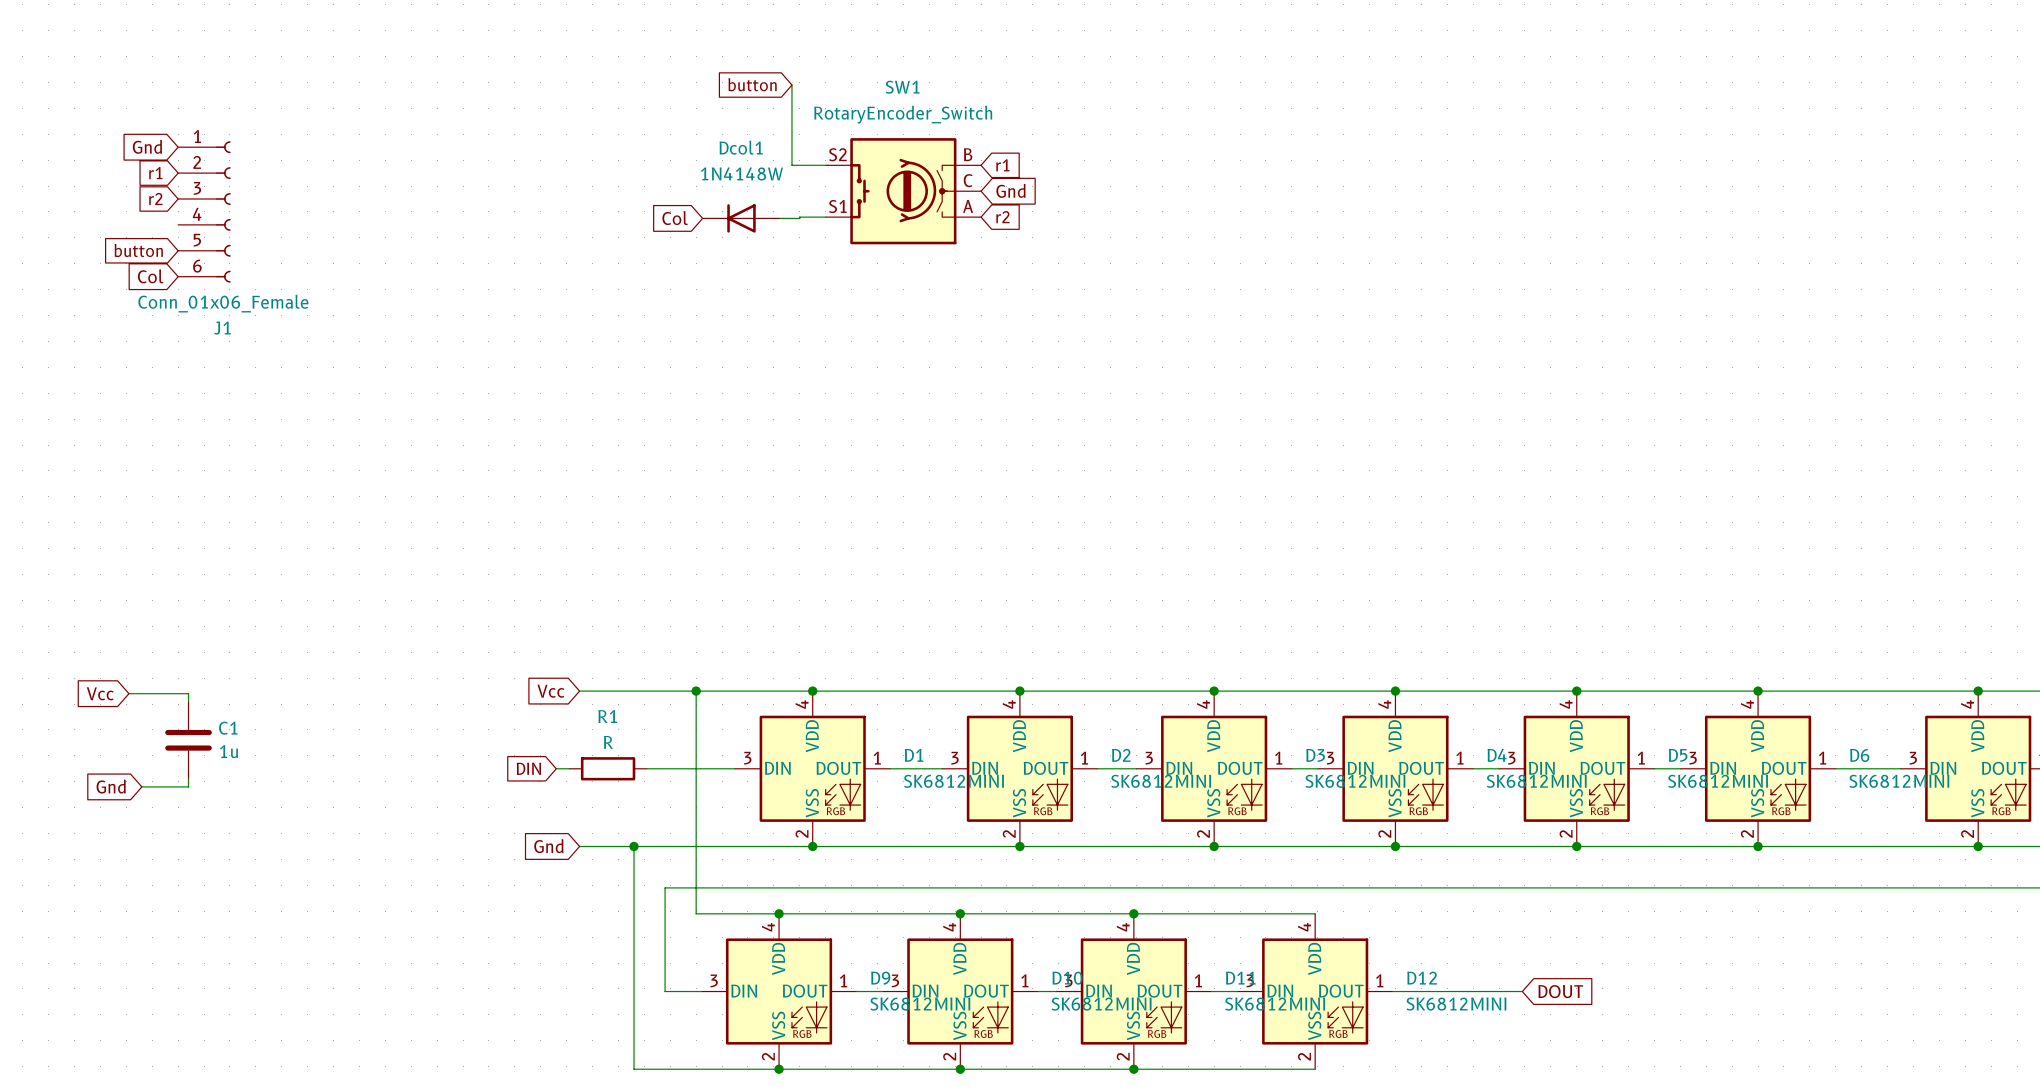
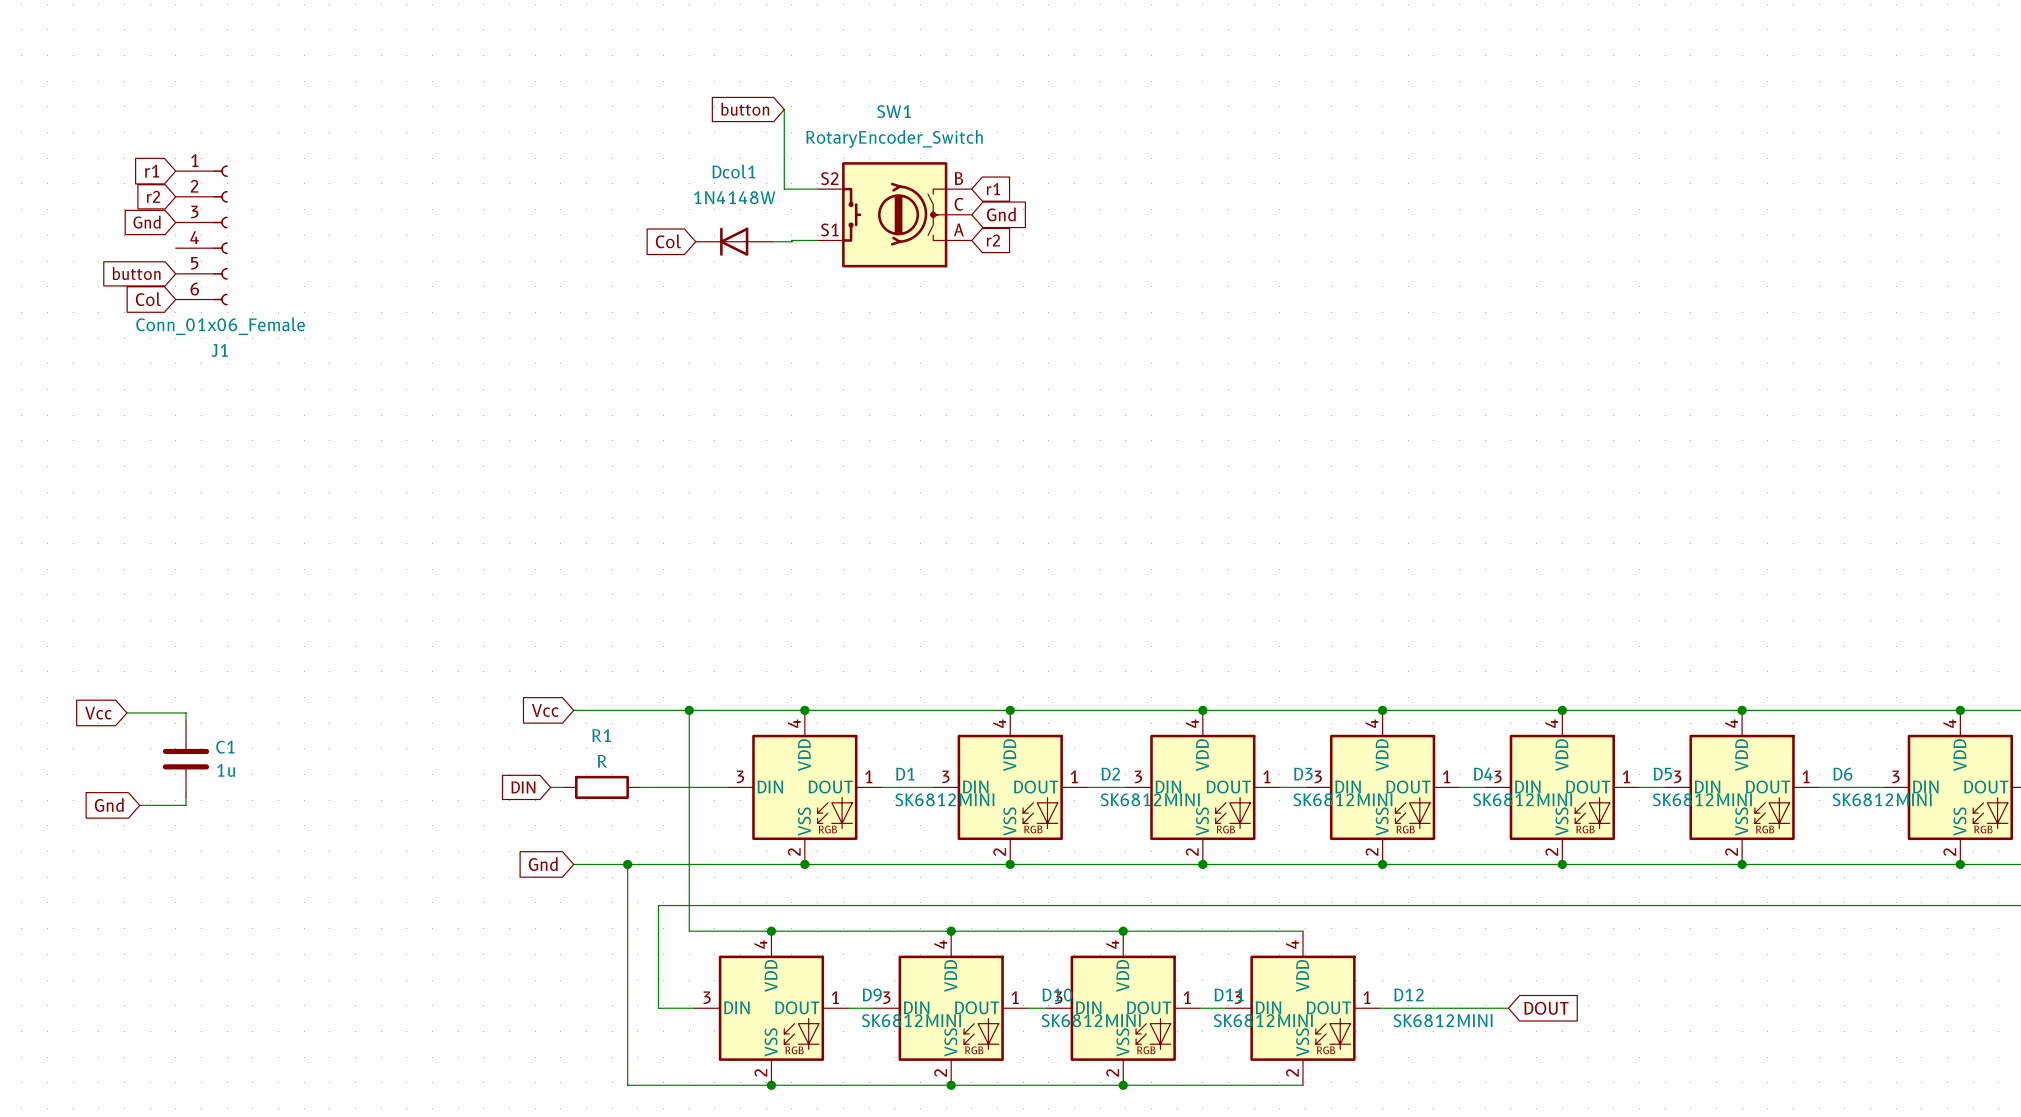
global label: Gnd (147, 146) -> r1 (152, 171)
global label: r1 (155, 173) -> r2 (153, 196)
global label: r2 (155, 199) -> Gnd (147, 222)

